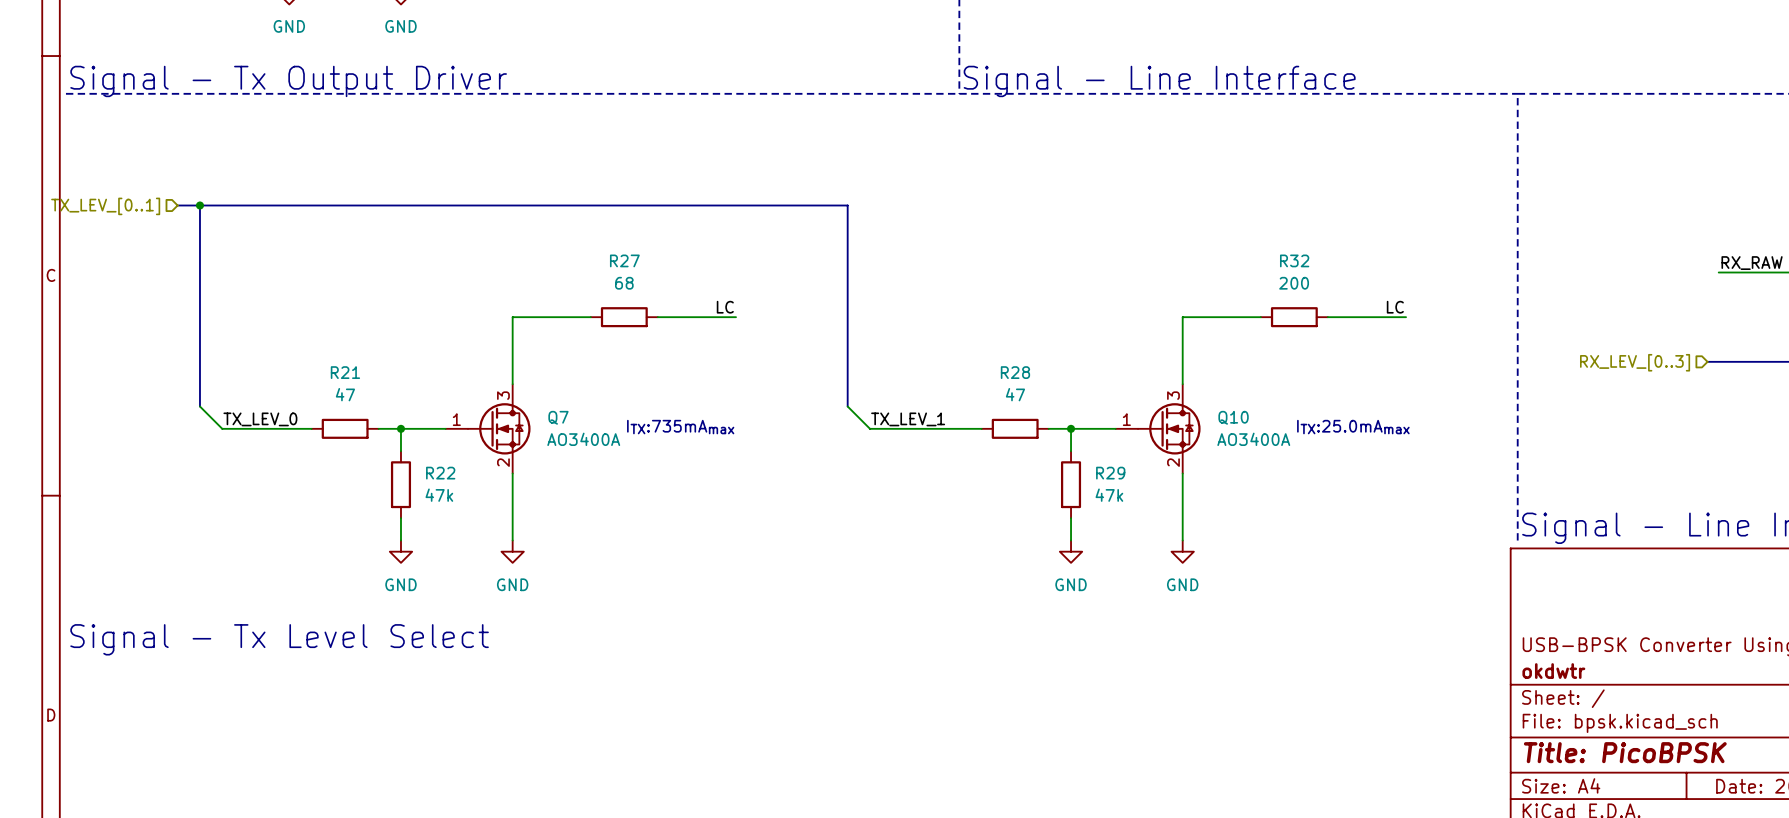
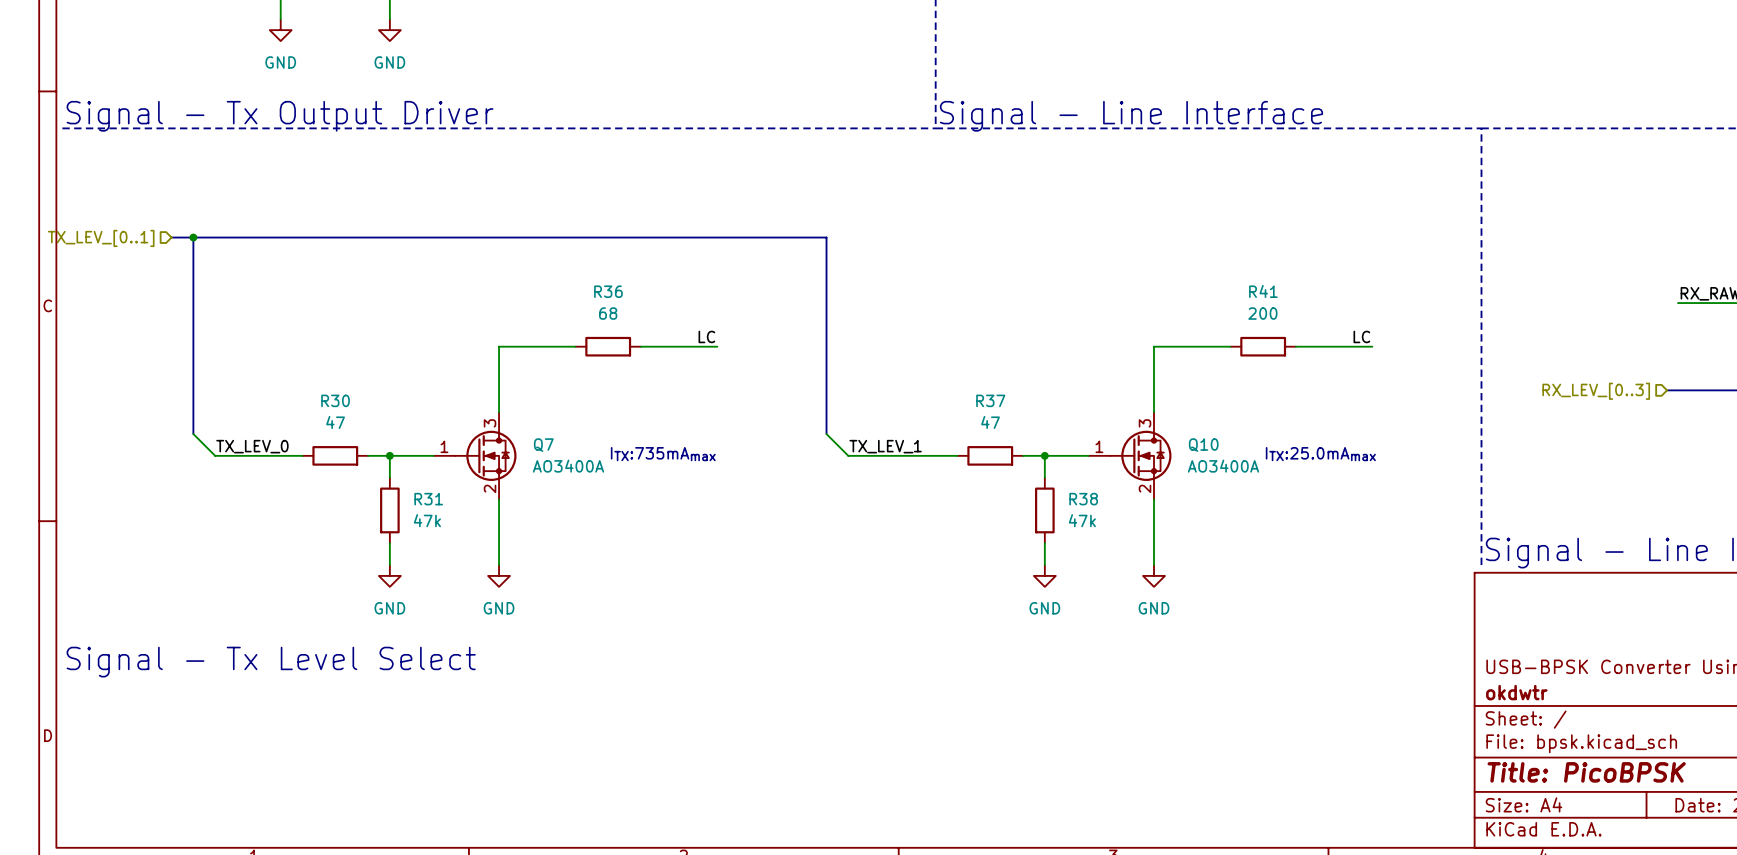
R27 name: R27 (624, 260) -> R36 (608, 291)
R32 name: R32 (1294, 260) -> R41 (1263, 291)
R21 name: R21 (345, 372) -> R30 (335, 400)
R28 name: R28 (1015, 372) -> R37 (990, 400)
R22 name: R22 (440, 473) -> R31 (428, 499)
R29 name: R29 (1110, 473) -> R38 (1083, 499)

